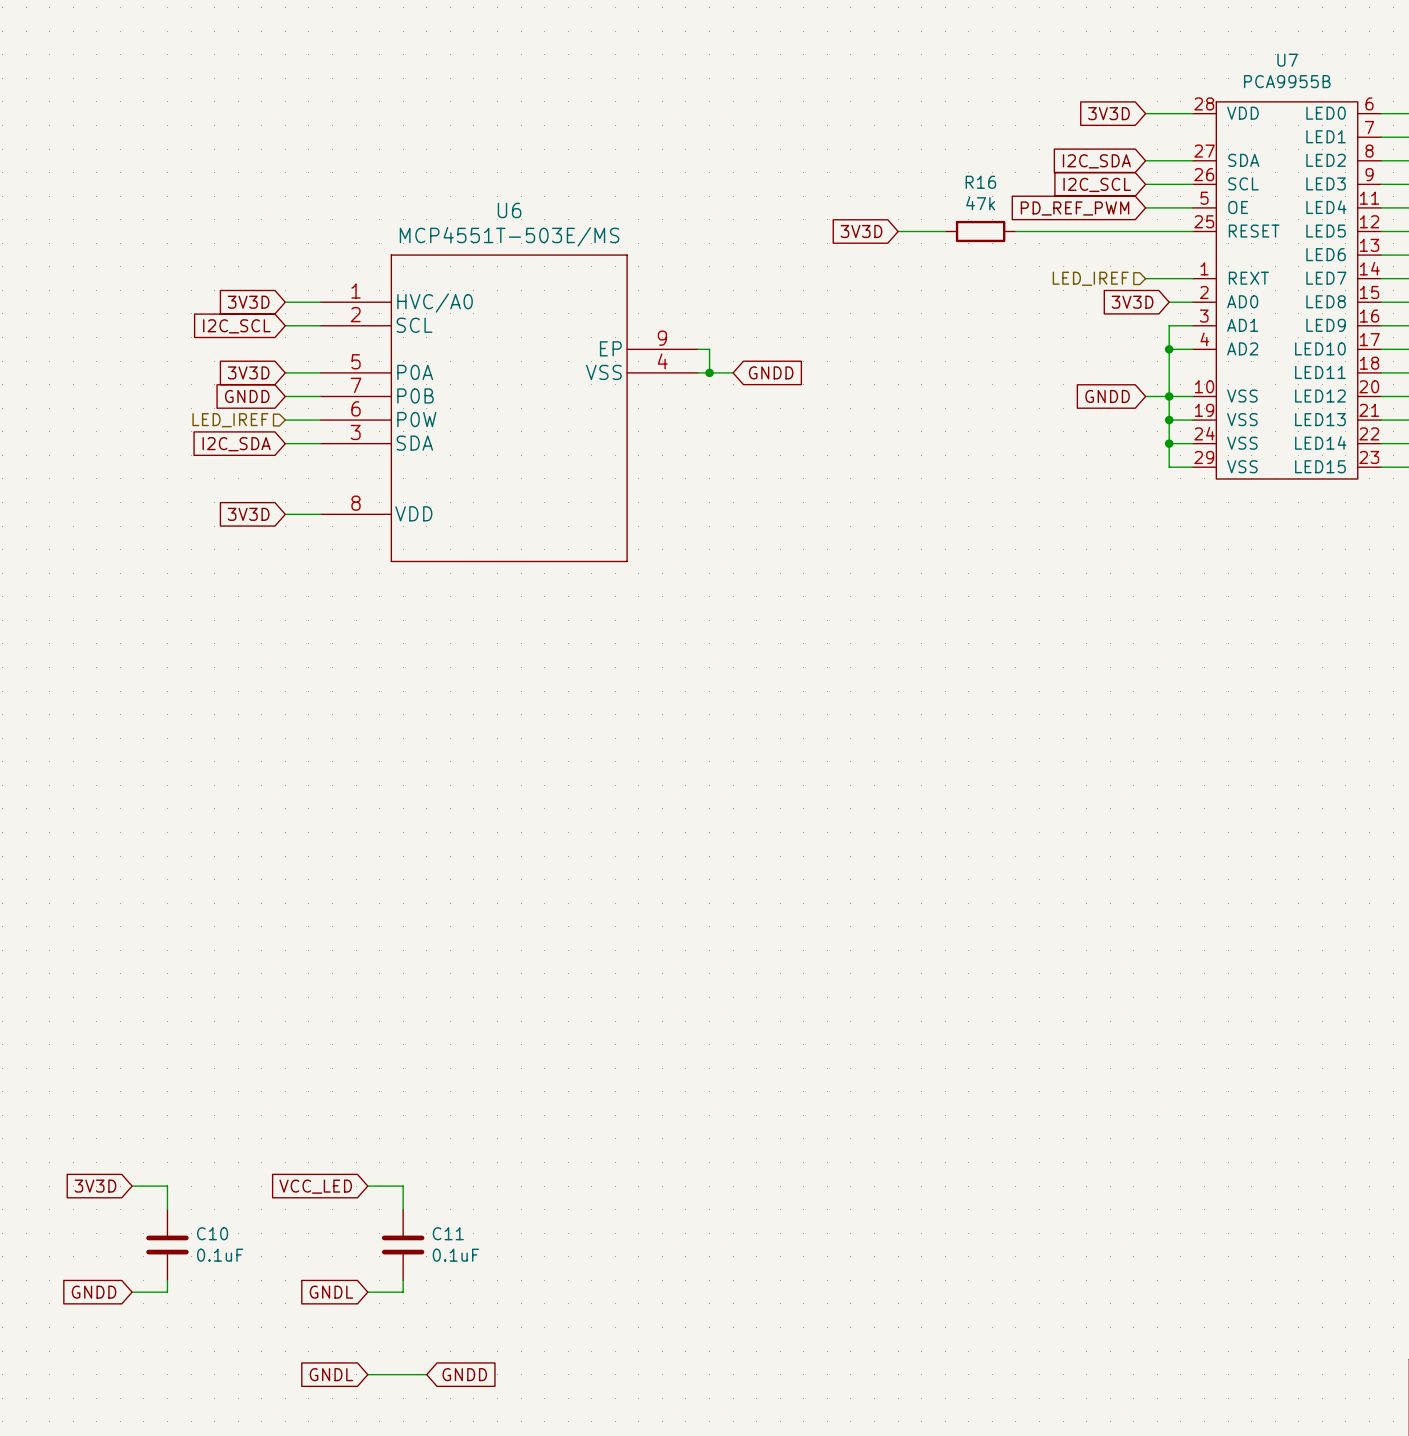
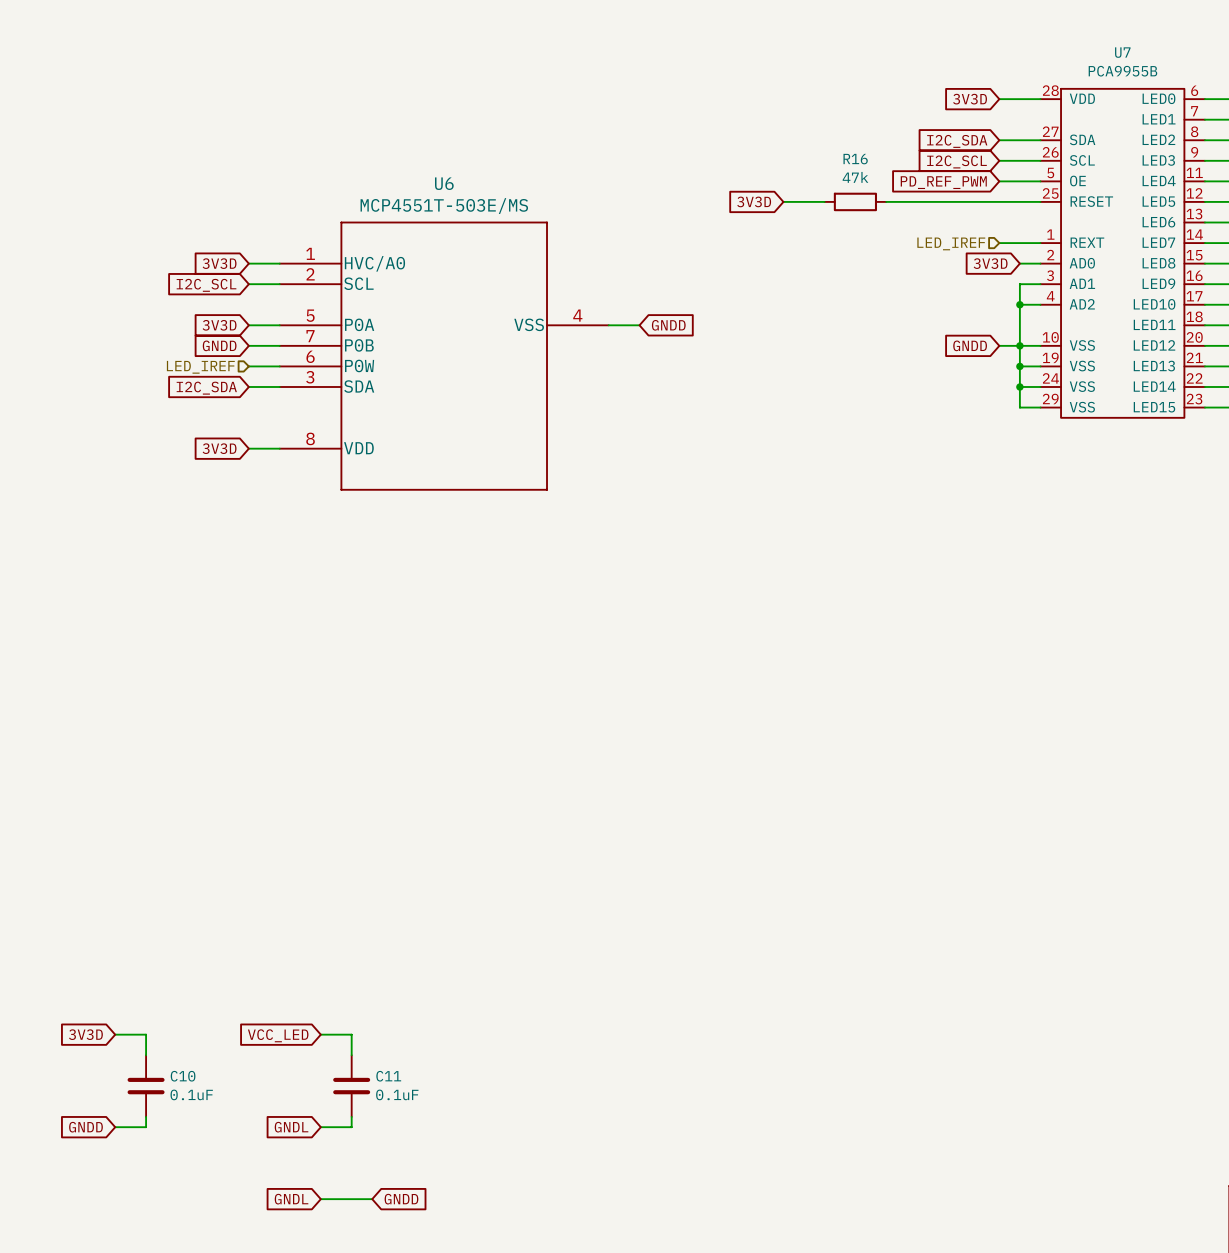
U6 symbol: [320, 254, 698, 563] -> [279, 221, 609, 491]
wire: (697, 349) (709, 349) (709, 372) -> none
junction: (709, 372) -> none

